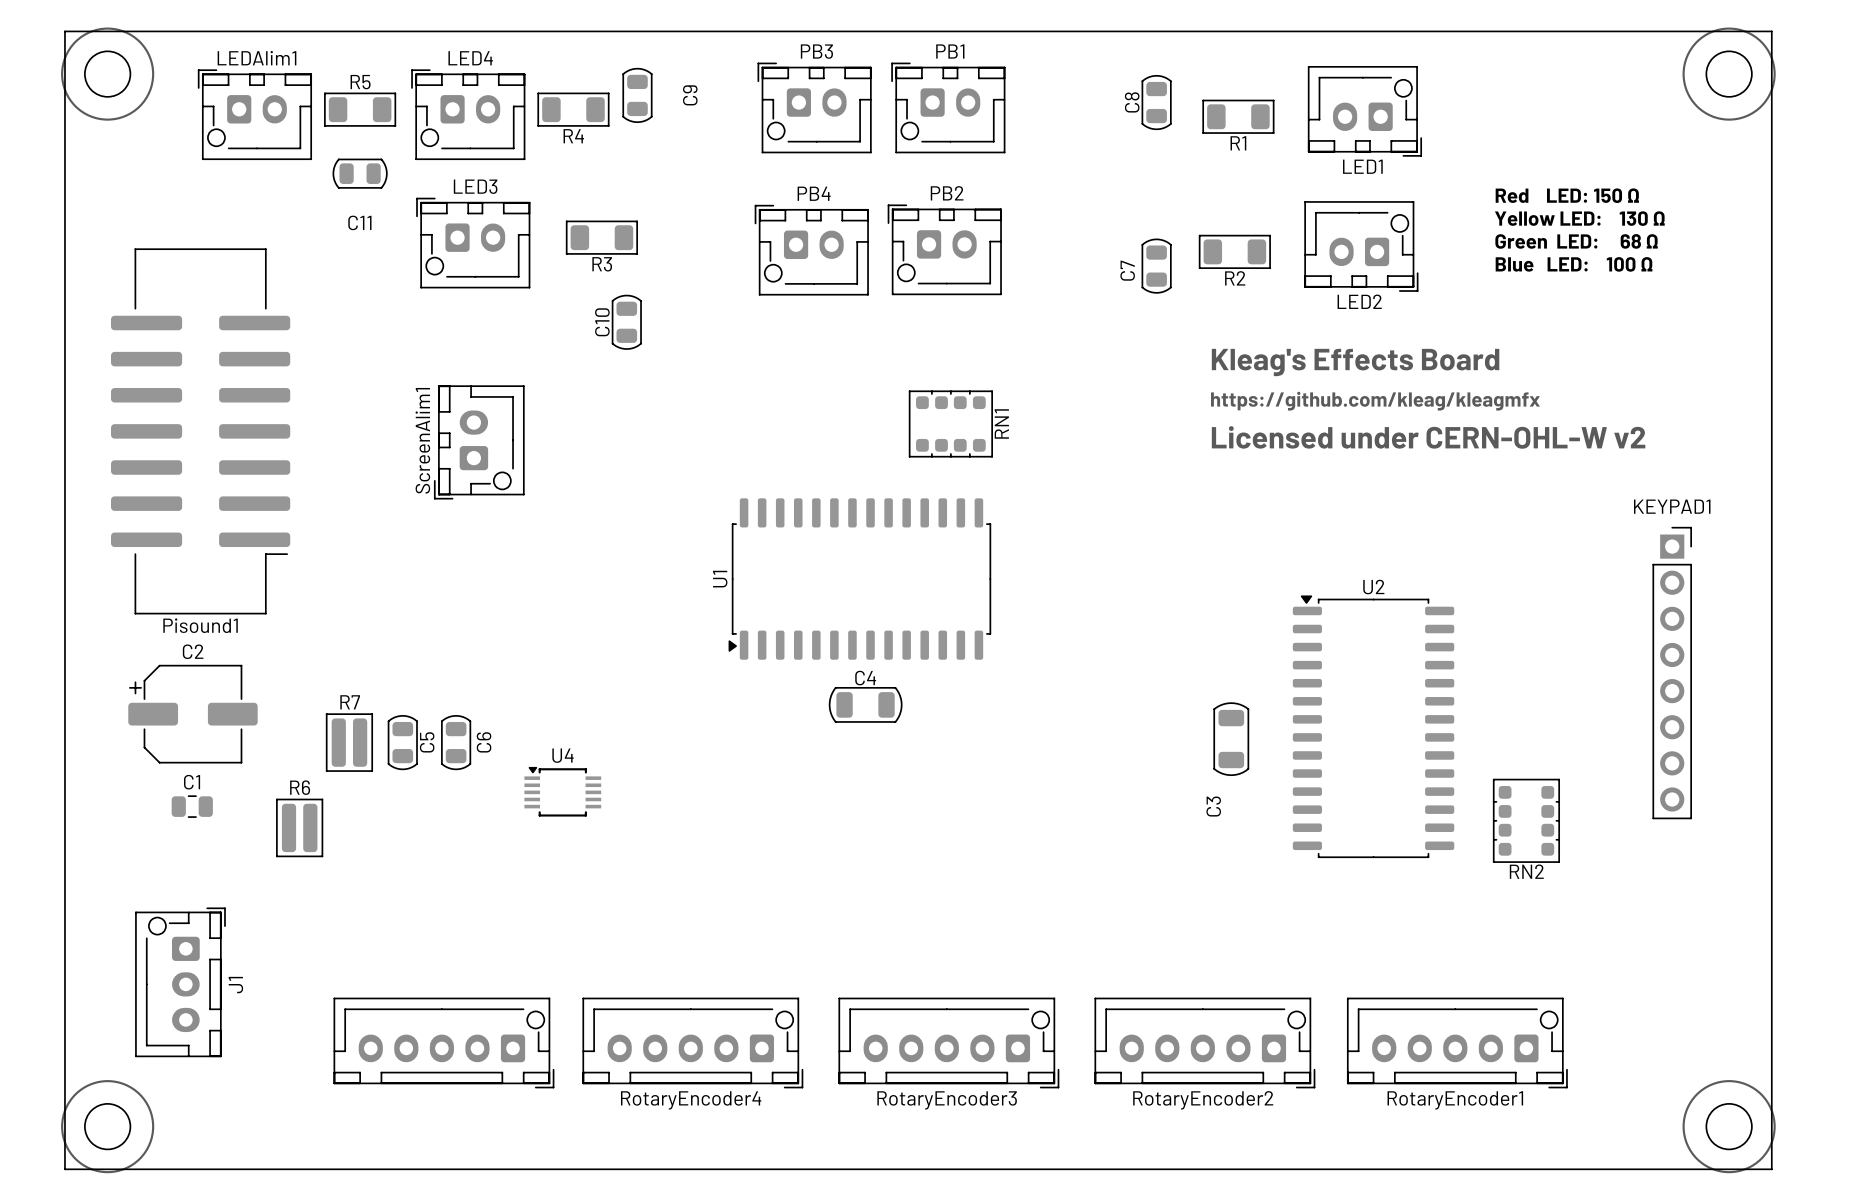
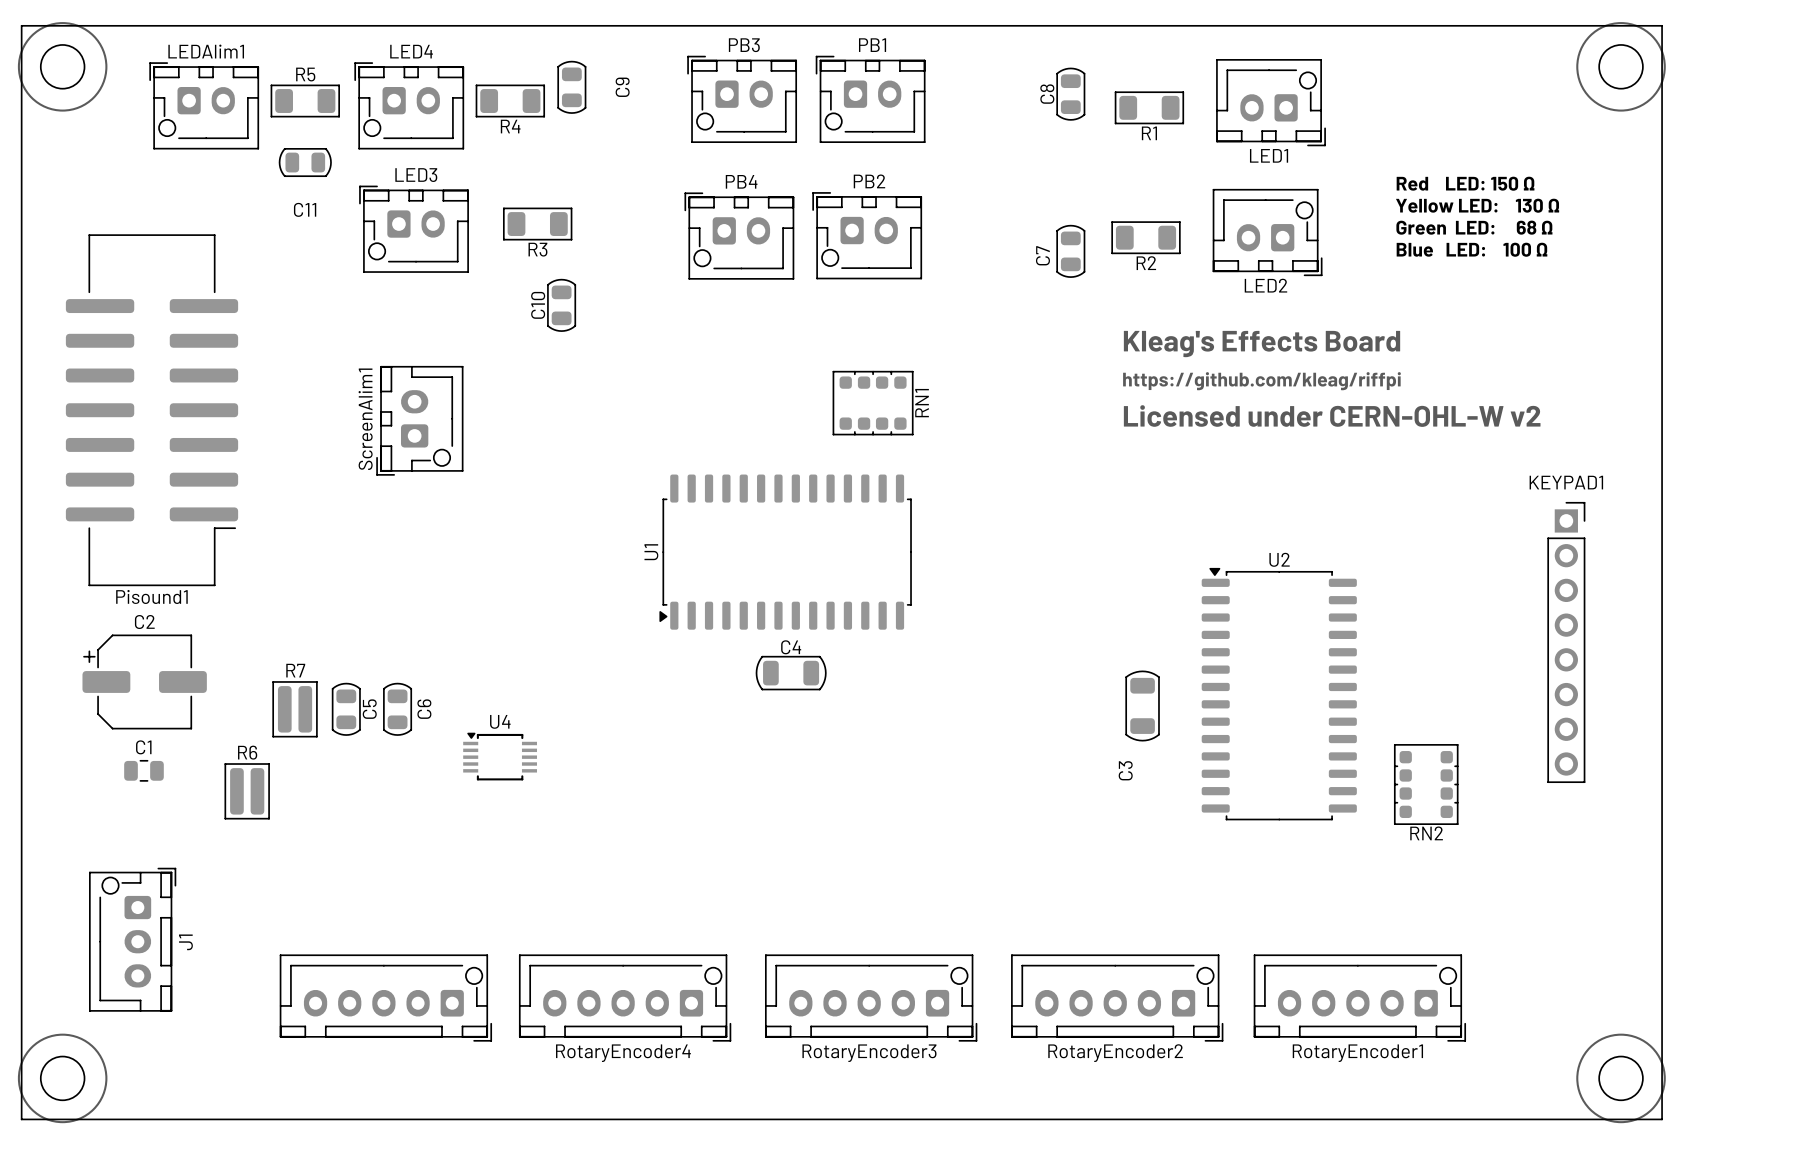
text: https://github.com/kleag/kleagmfx (1375, 401) -> https://github.com/kleag/riffpi (1261, 381)

